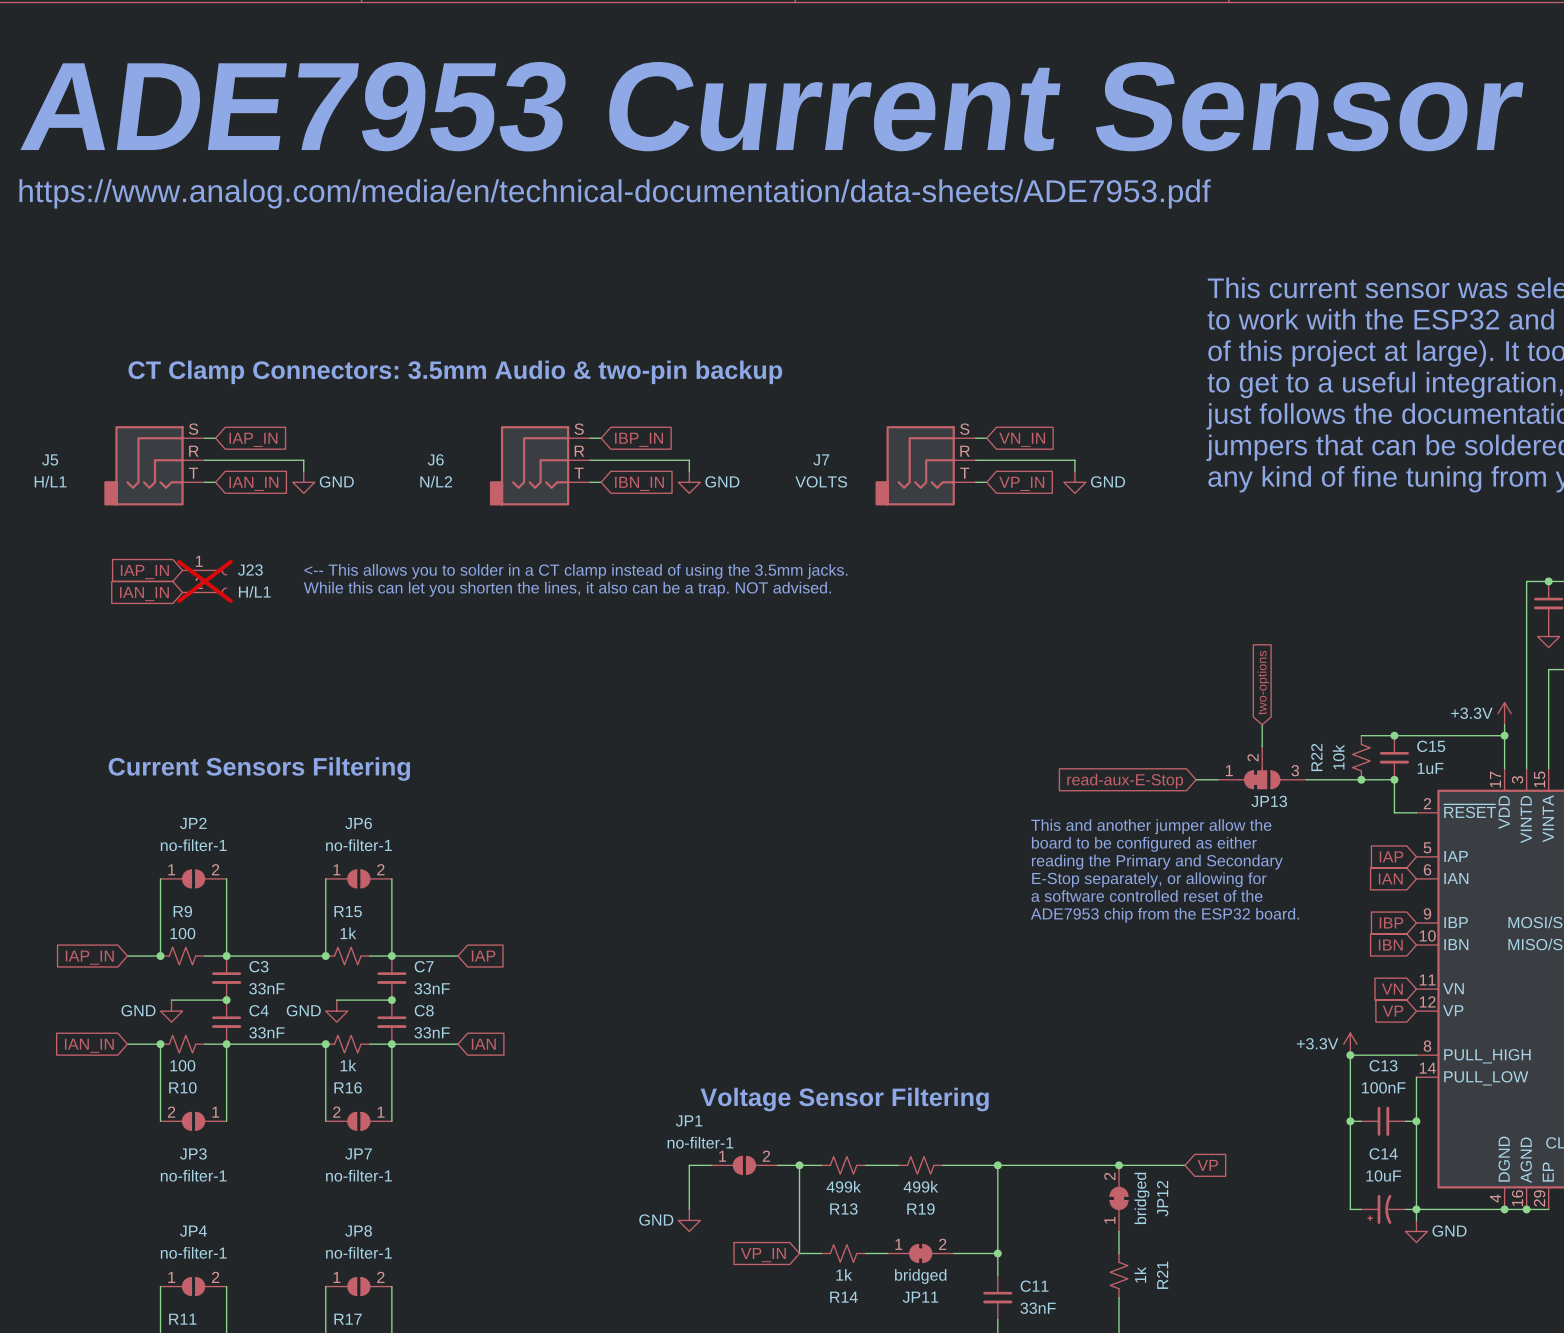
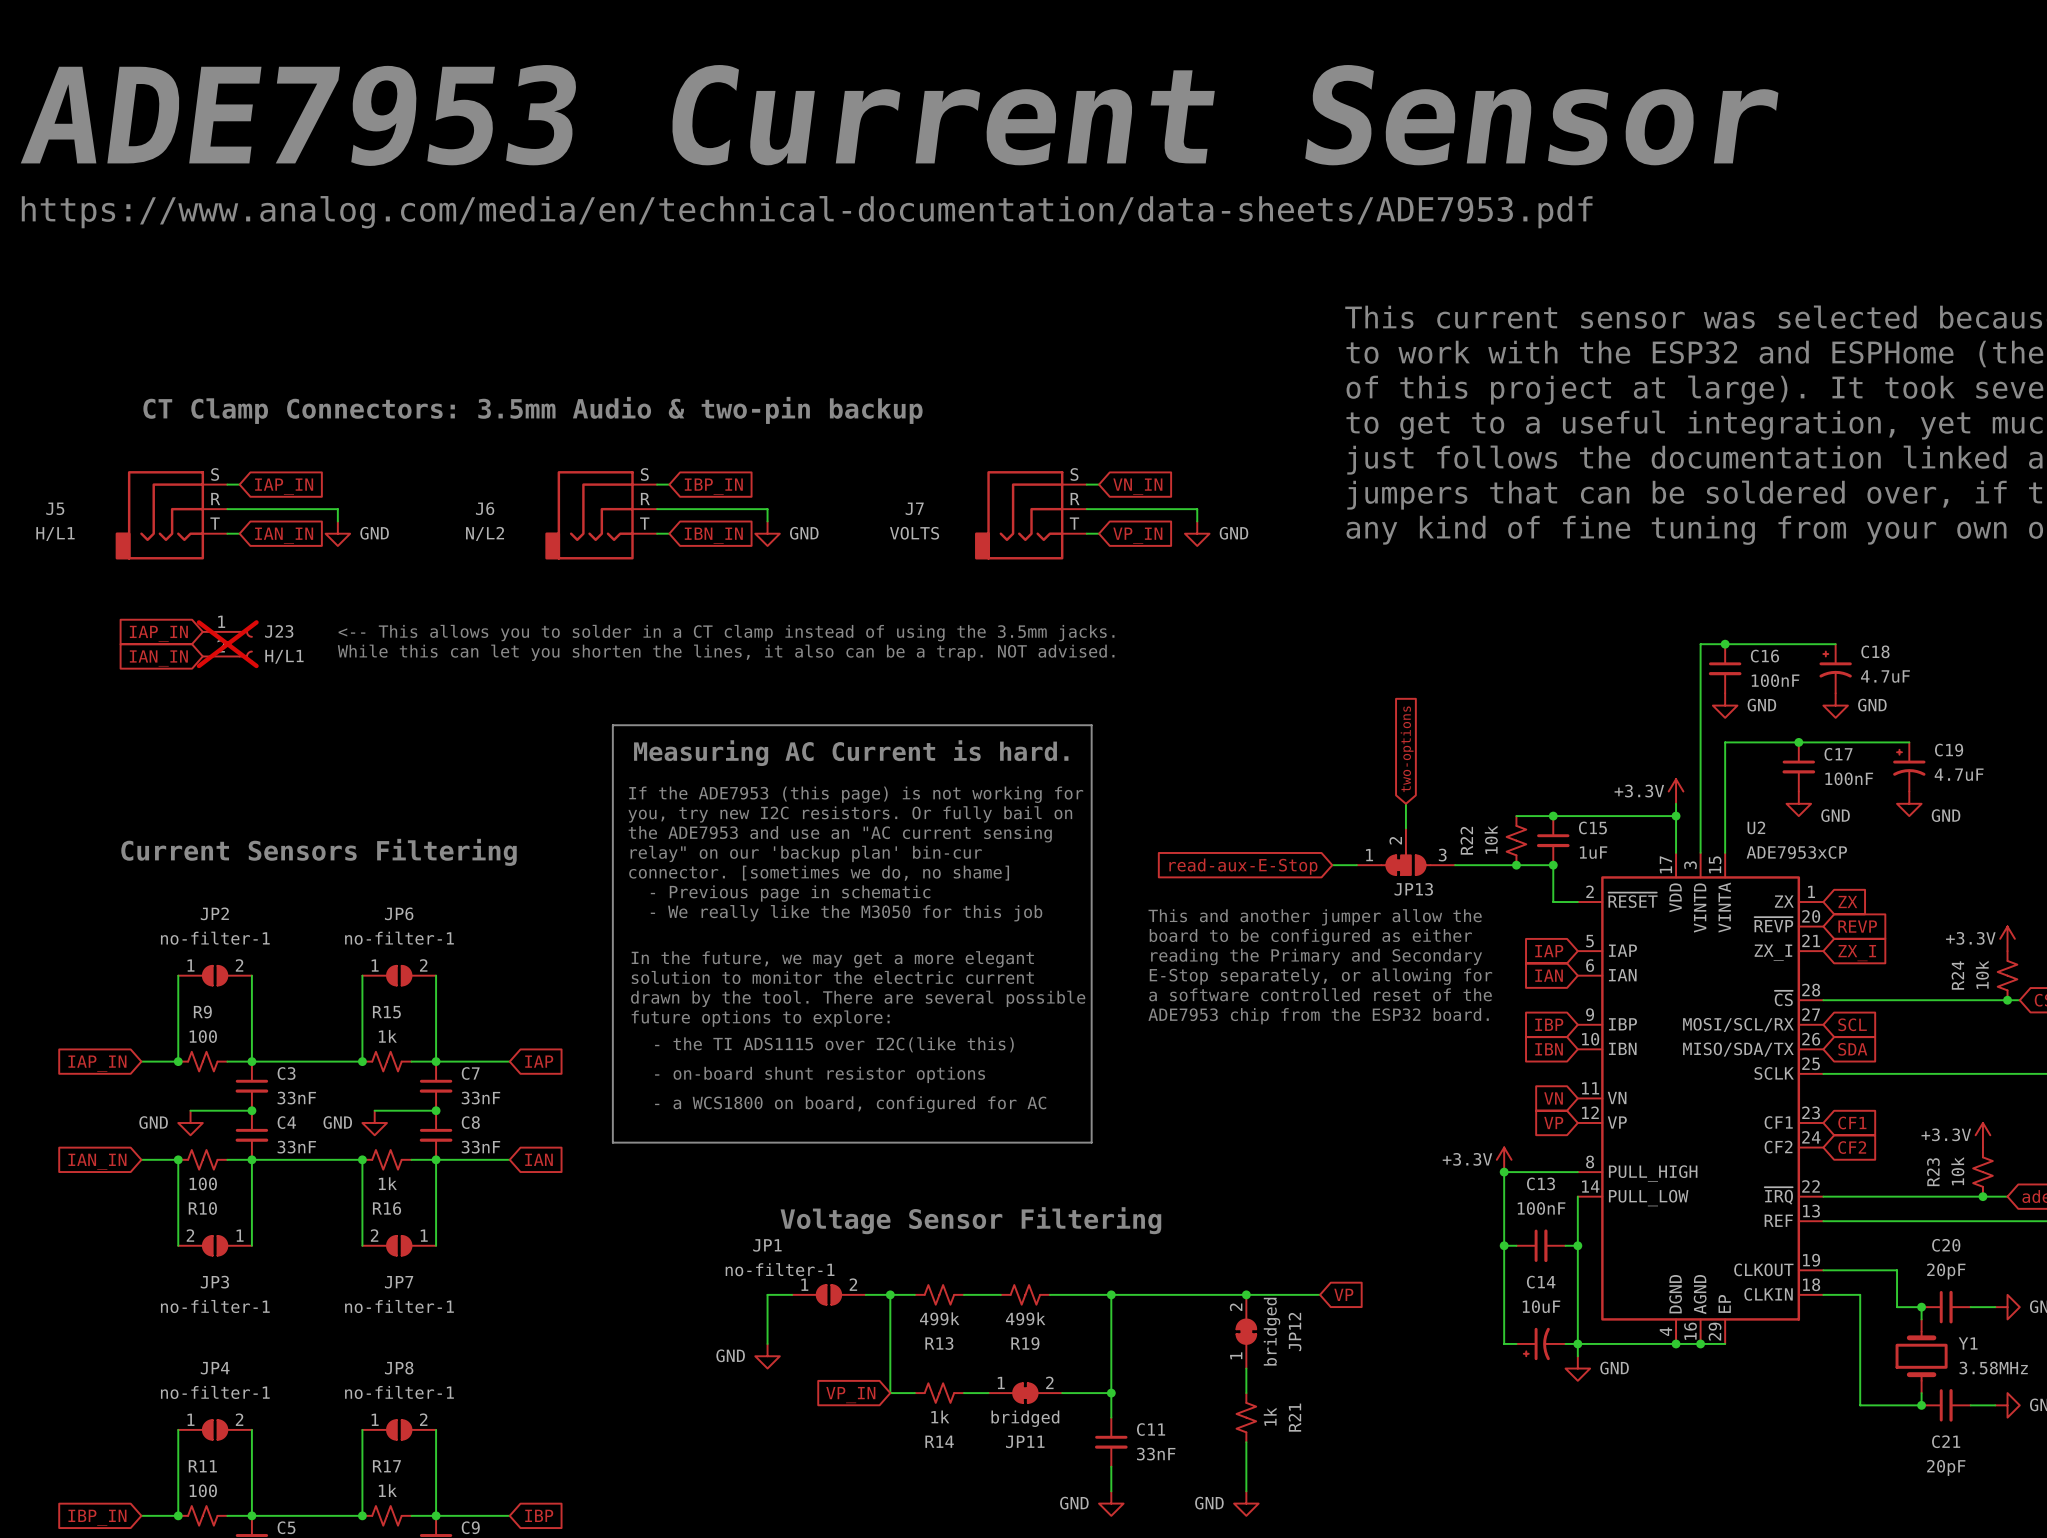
line: none -> (612, 725) (1091, 725) (1091, 1142) (612, 1142) (612, 725)
text: none -> Measuring AC Current is hard. (851, 753)
text: none -> If the ADE7953 (this page) is not working for (856, 794)
text: none -> you, try new I2C resistors. Or fully bail on (850, 814)
text: none -> the ADE7953 and use an "AC current sensing (840, 834)
text: none -> relay" on our 'backup plan' bin-cur (806, 853)
text: none -> connector. [sometimes we do, no shame] (819, 873)
text: none -> - Previous page in schematic (790, 893)
text: none -> - We really like the M3050 for this job (846, 913)
text: none -> In the future, we may get a more elegant (832, 959)
text: none -> solution to monitor the electric current (832, 977)
text: none -> drawn by the tool. There are several possible (858, 998)
text: none -> future options to explore: (760, 1018)
text: none -> - the TI ADS1115 over I2C (779, 1043)
text: none -> (like this) (961, 1044)
text: none -> - on-board shunt resistor options (820, 1074)
text: none -> - a WCS1800 on board, configured for AC (850, 1104)

